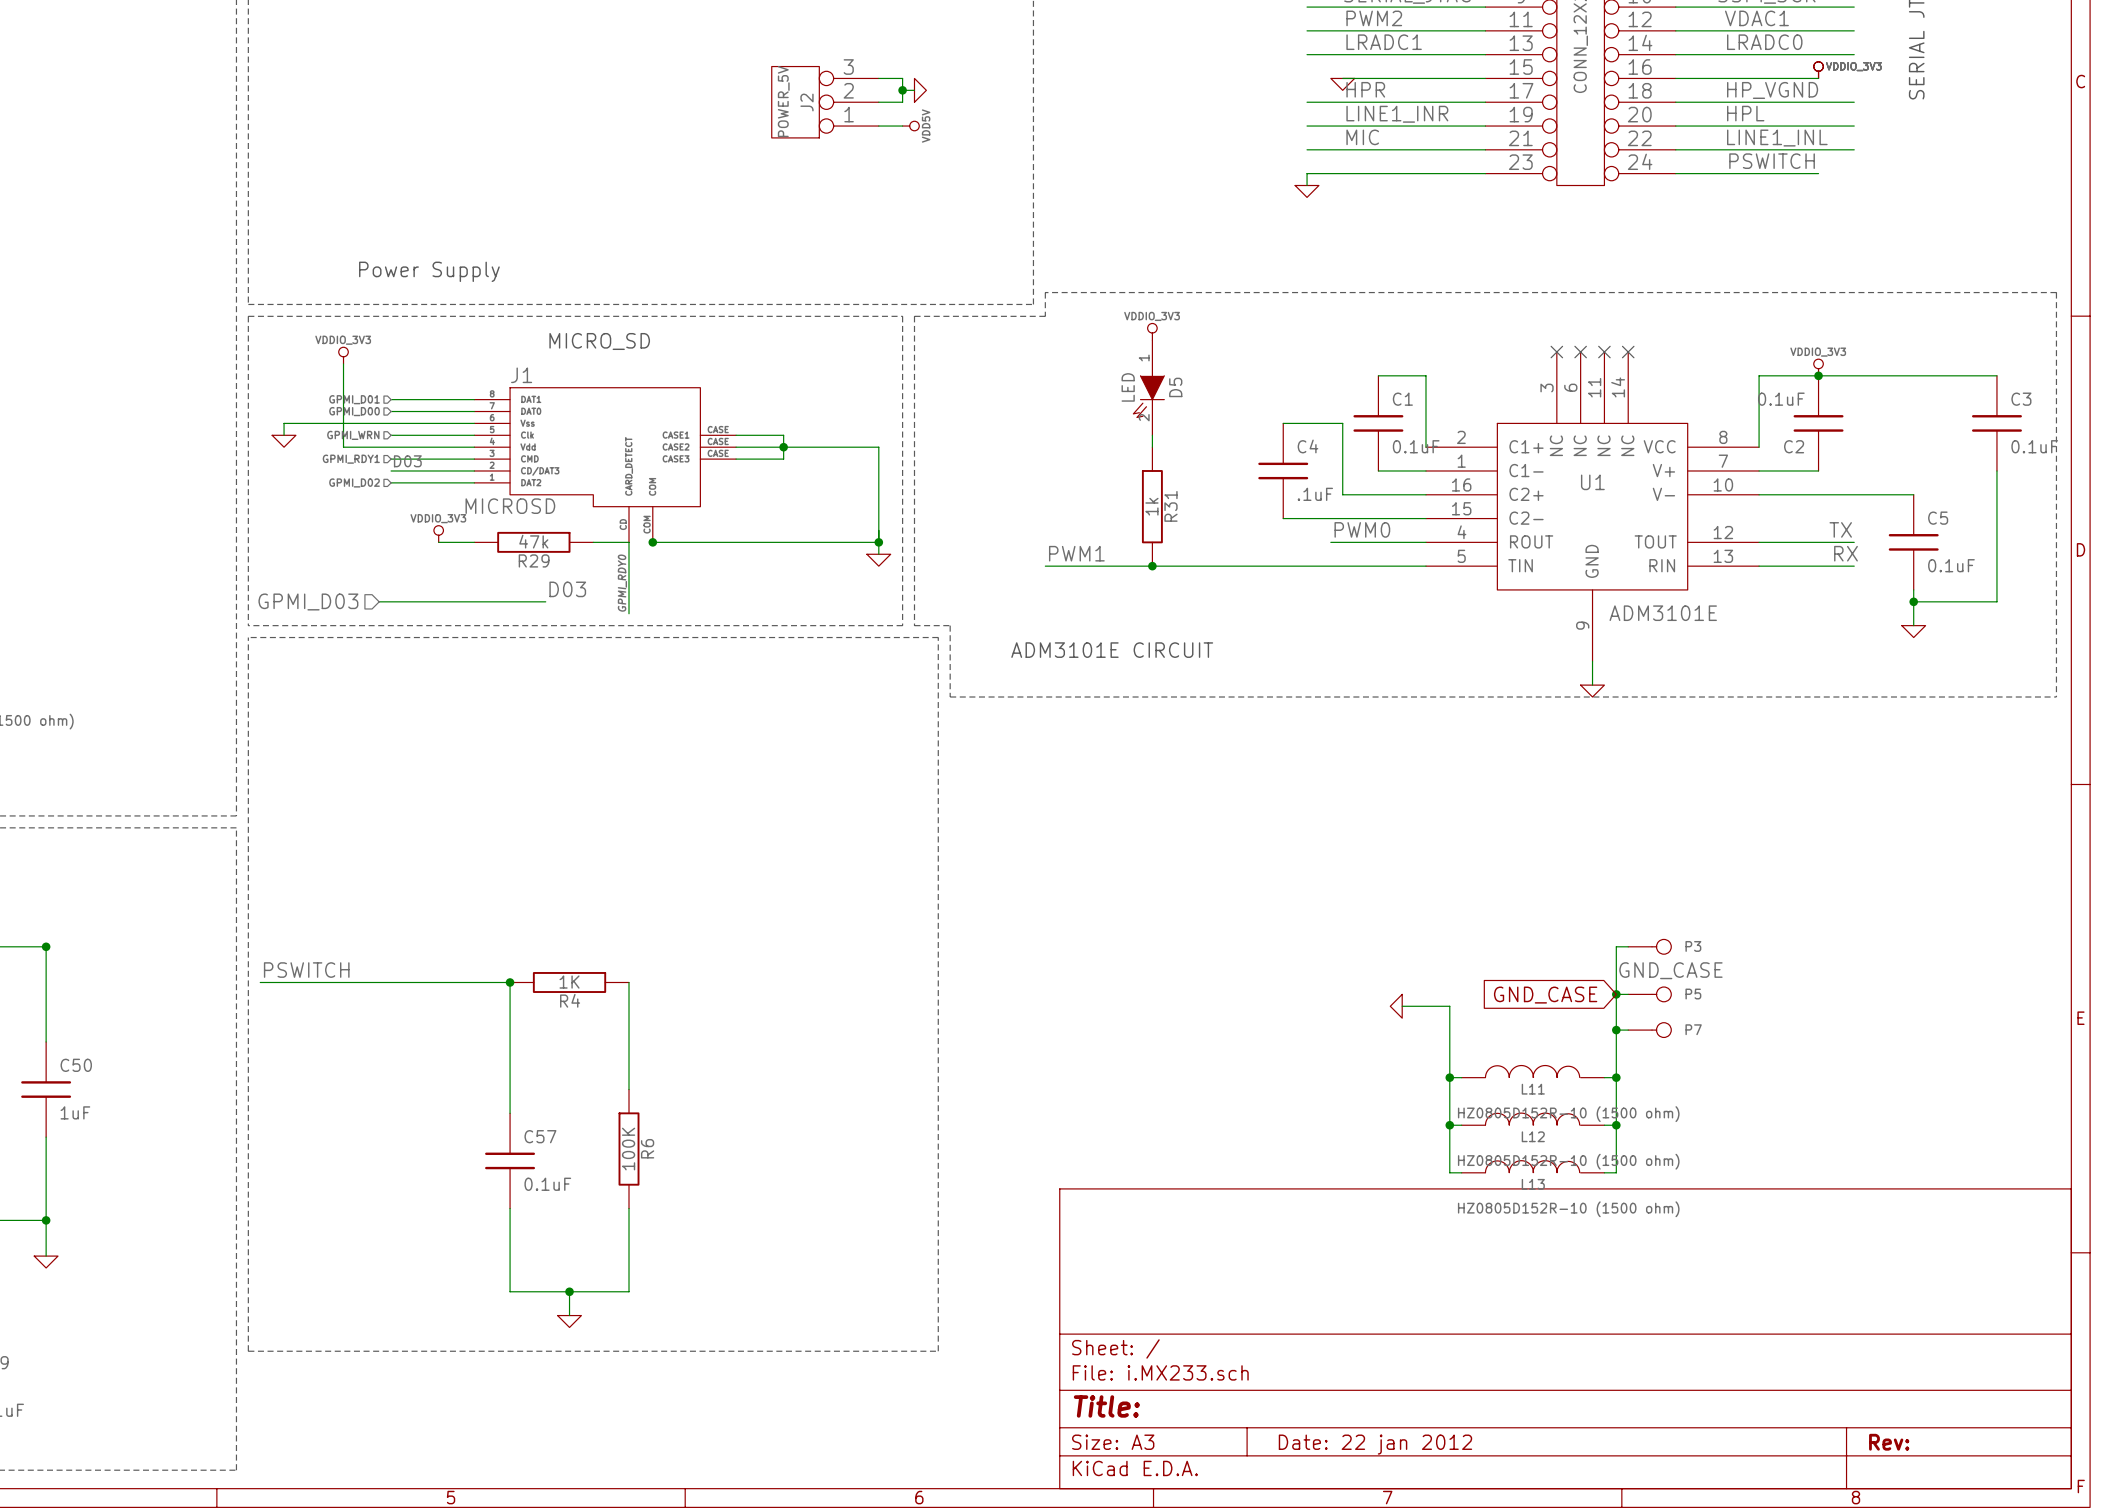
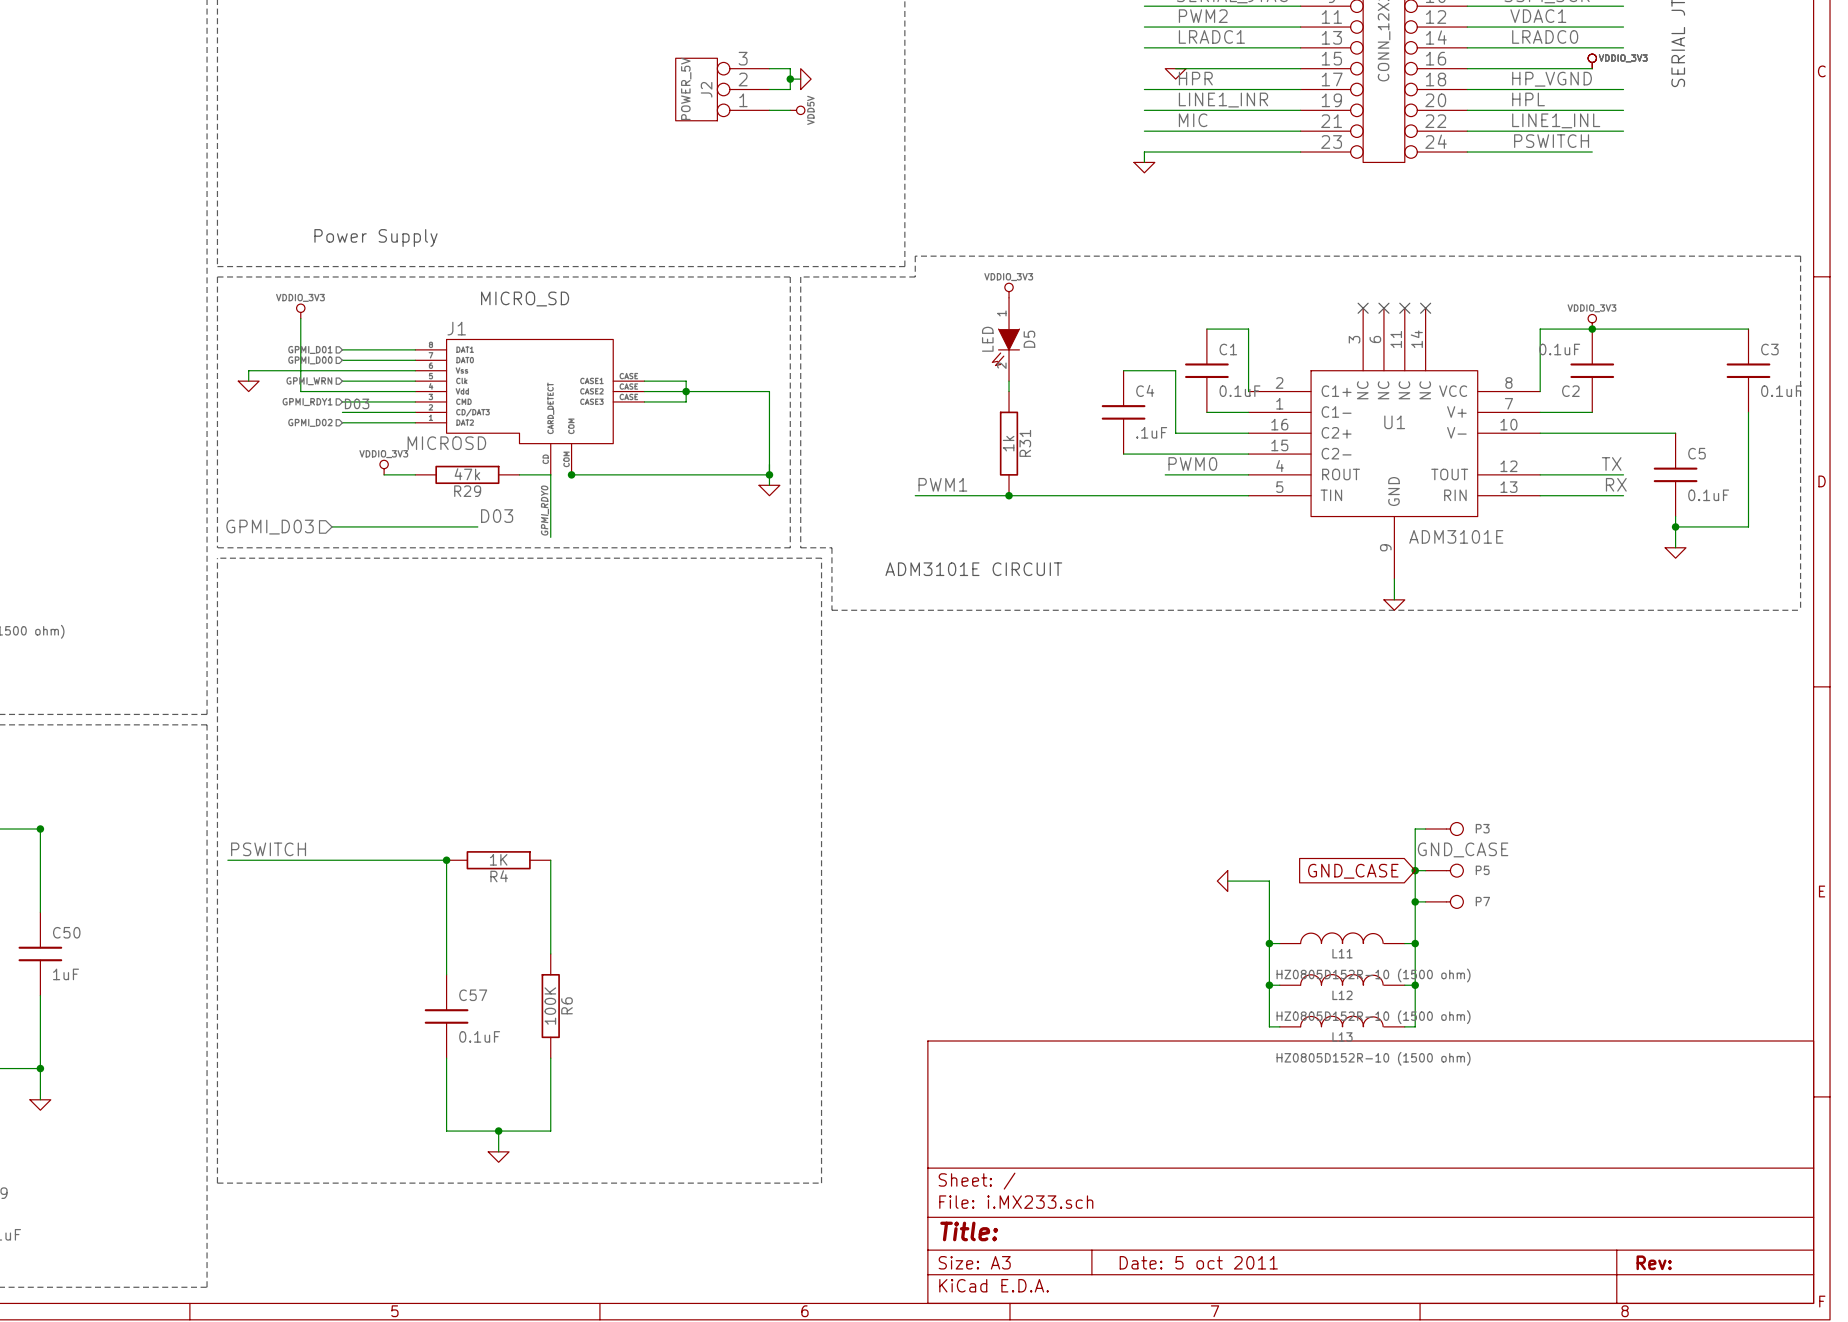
title block: Date: 22 jan 2012 (1375, 1444) -> Date: 5 oct 2011 (1198, 1262)

